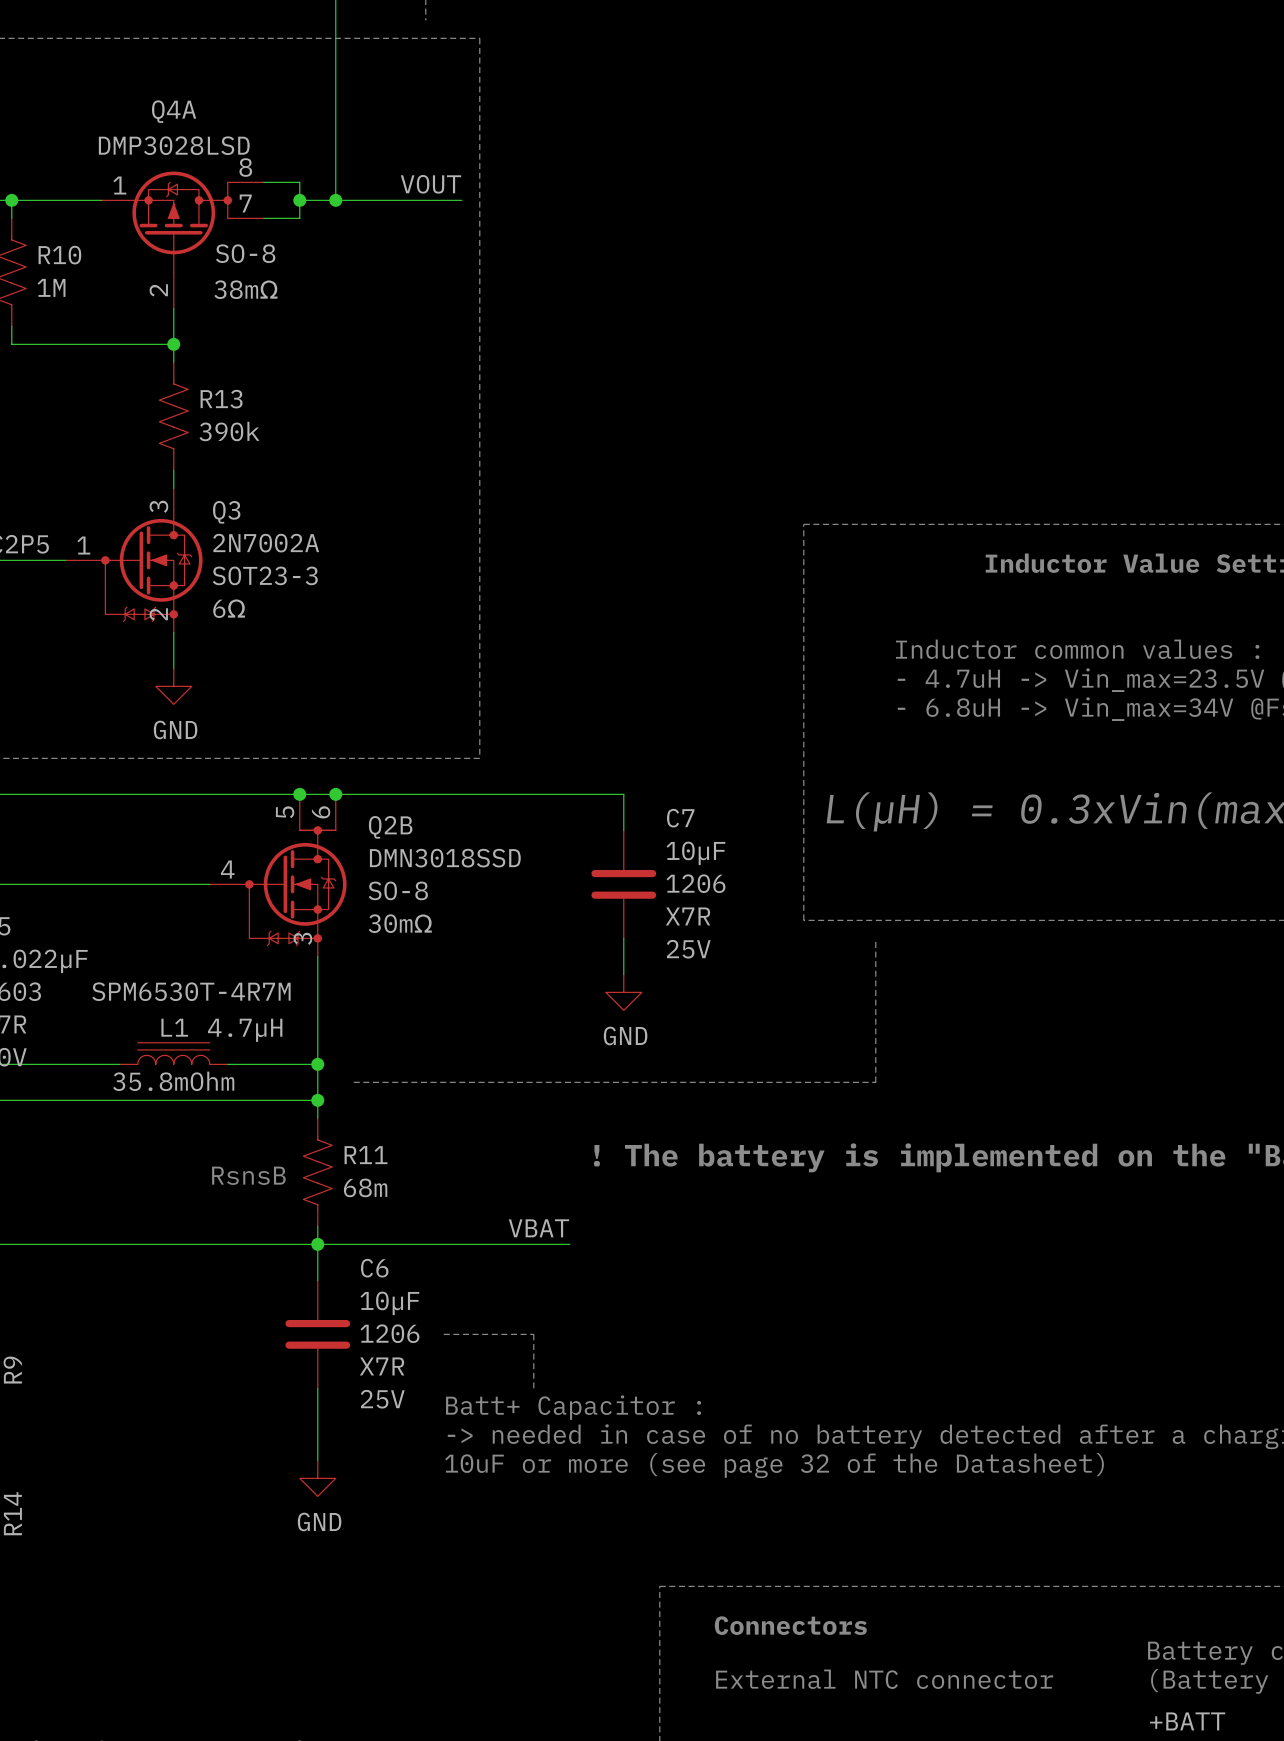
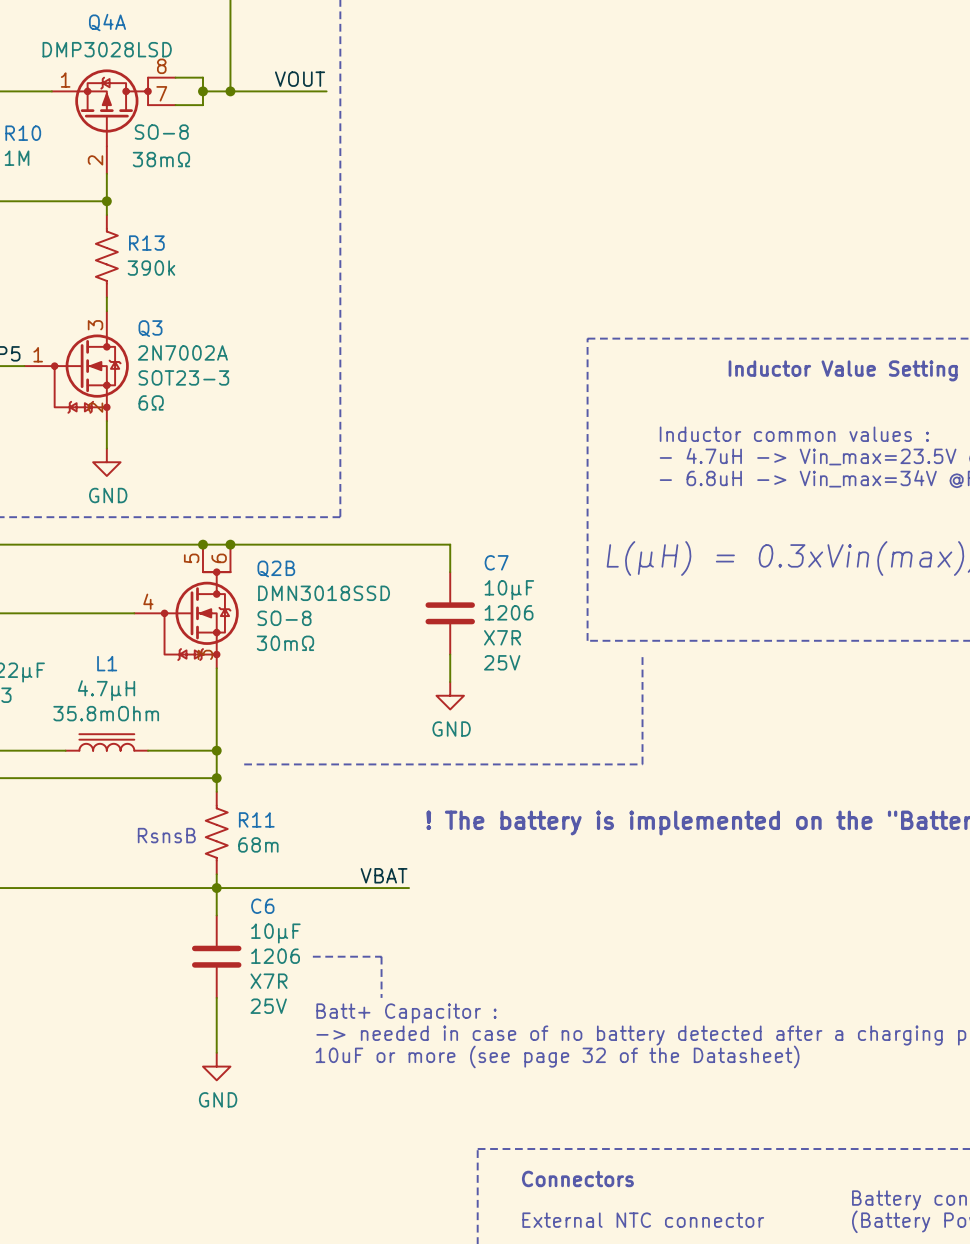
L1 value: SPM6530T-4R7M (191, 991) -> none
L1 name position: L1 (174, 1027) -> L1 (107, 663)
L1 text position: 4.7µH (245, 1030) -> 4.7µH (106, 690)
L1 text position: 35.8mOhm (173, 1081) -> 35.8mOhm (106, 713)

